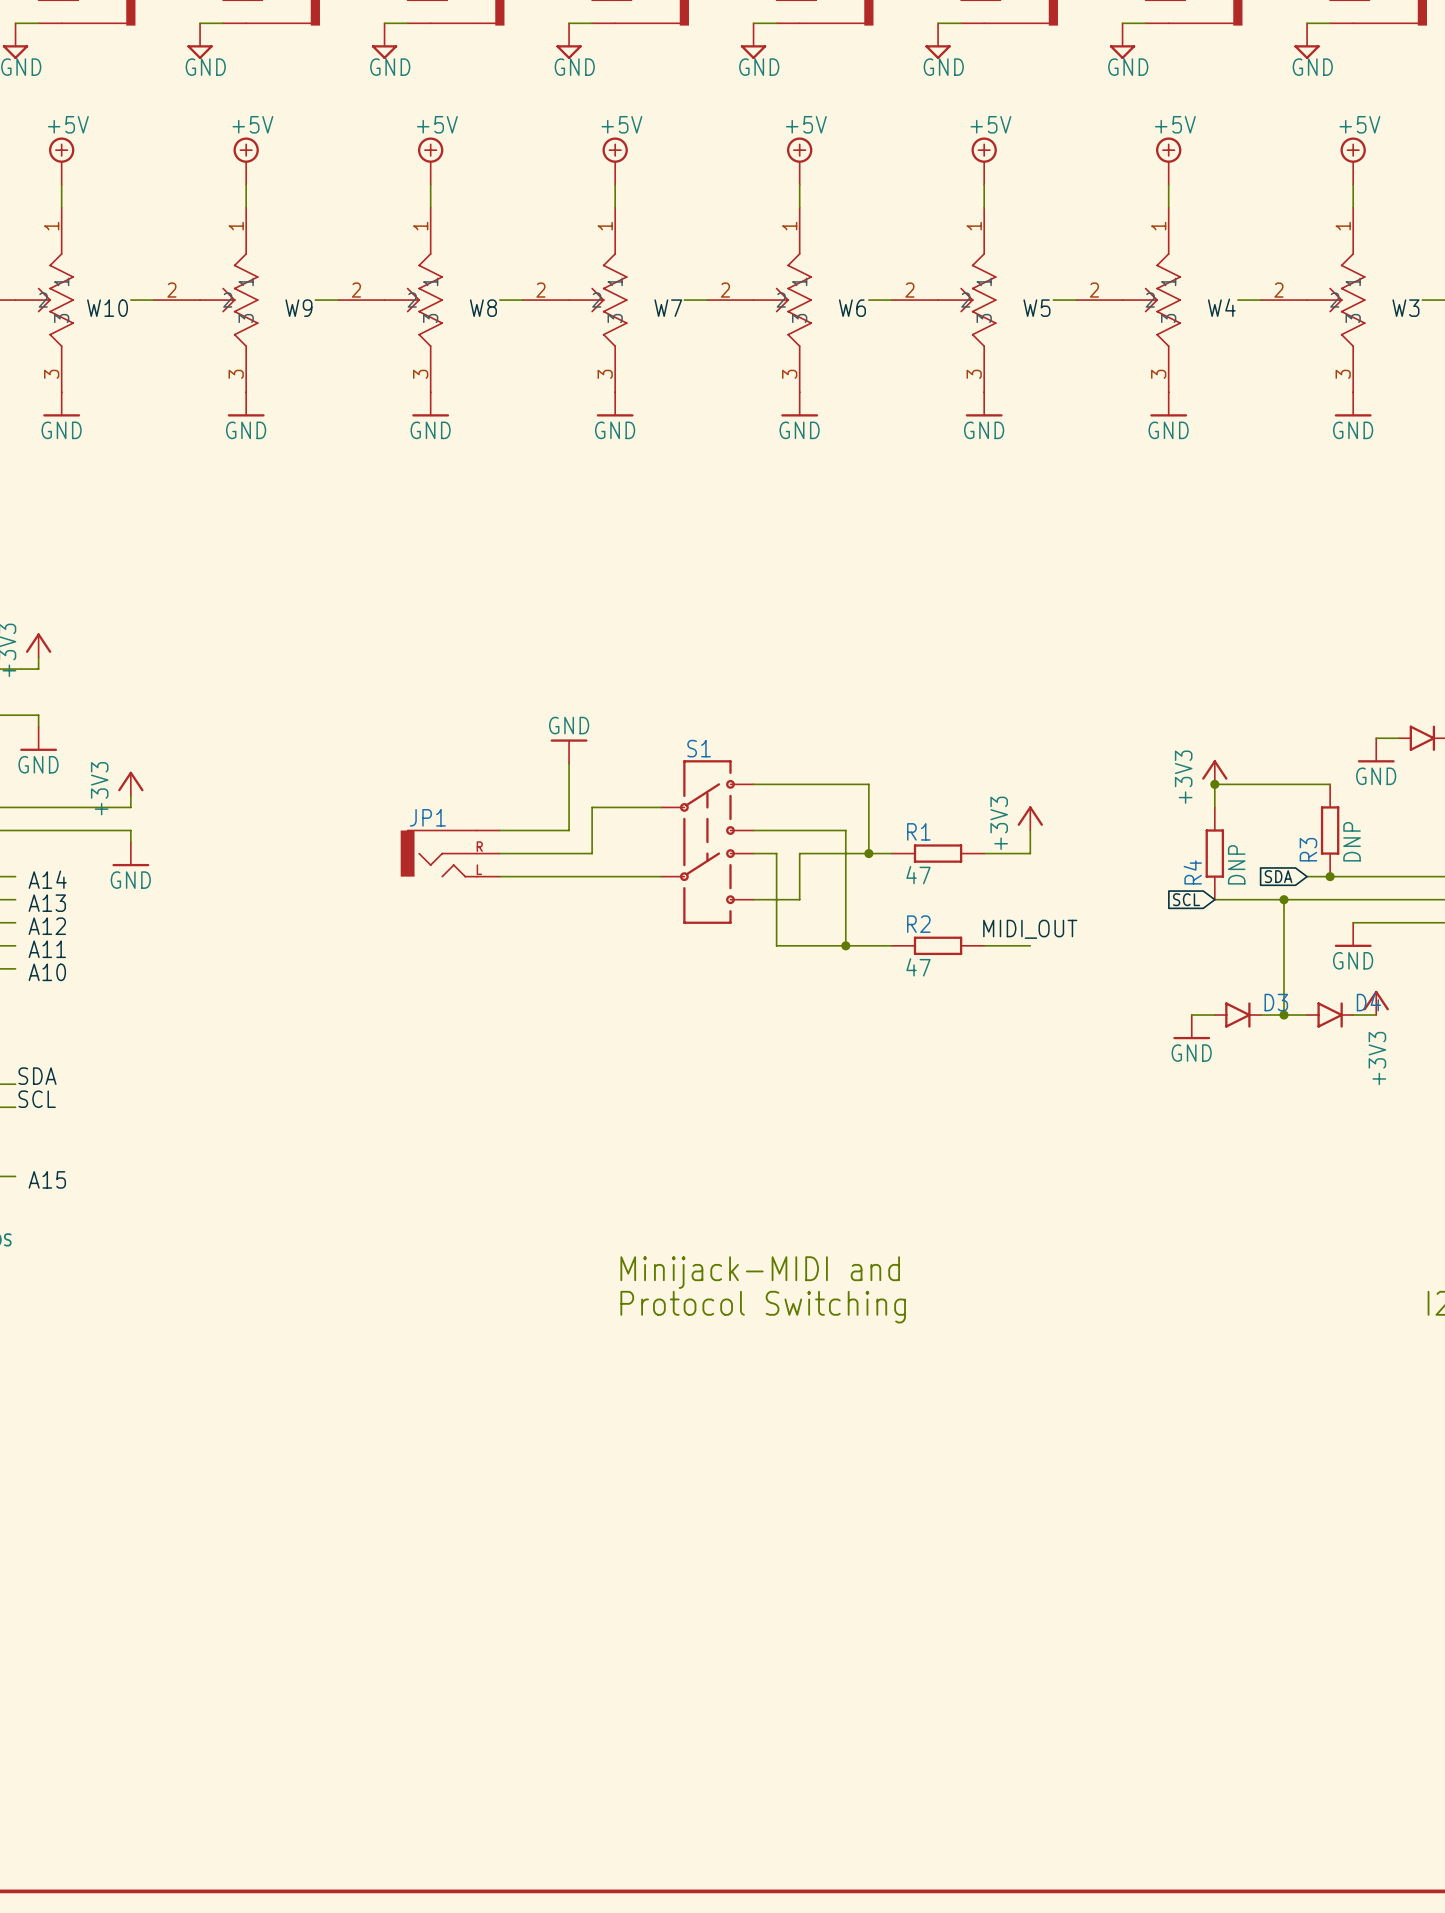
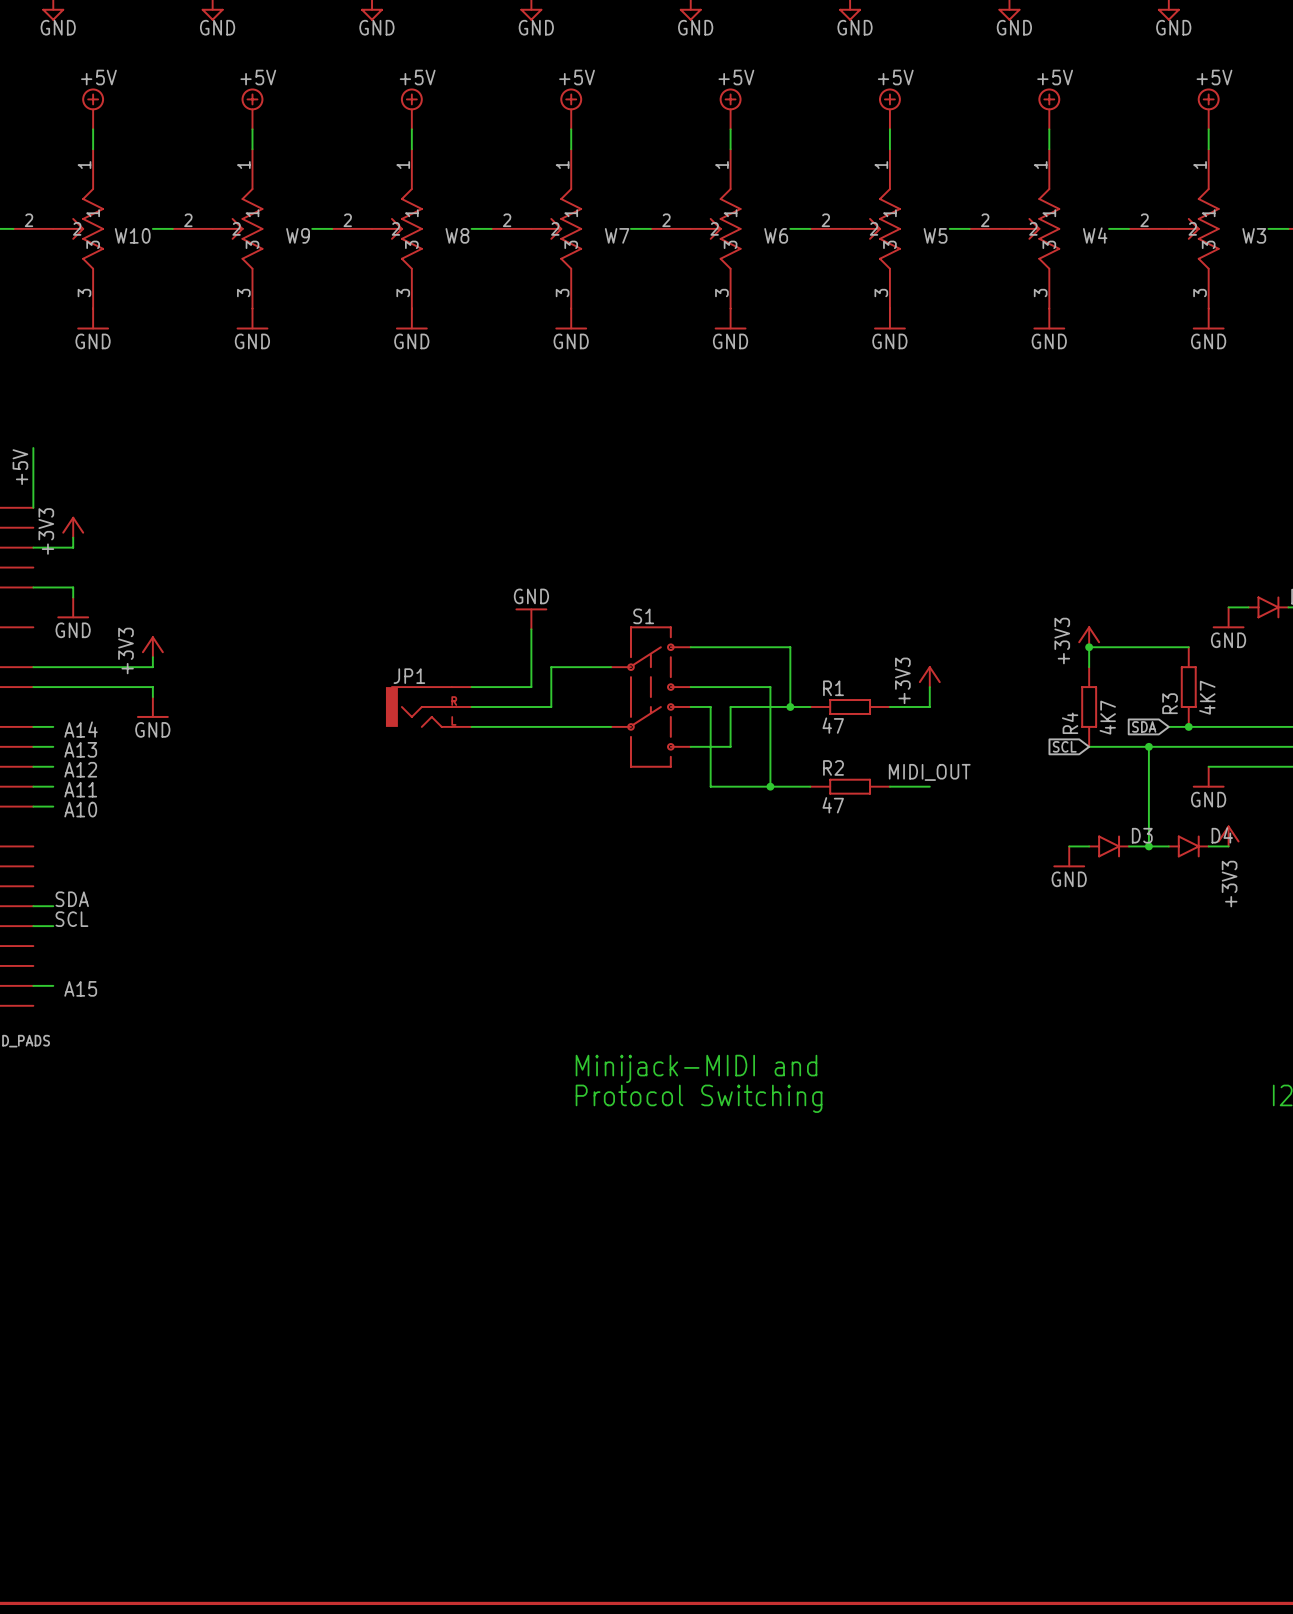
R3 value: DNP (1352, 841) -> 4K7 (1207, 697)
R4 value: DNP (1236, 864) -> 4K7 (1107, 717)

